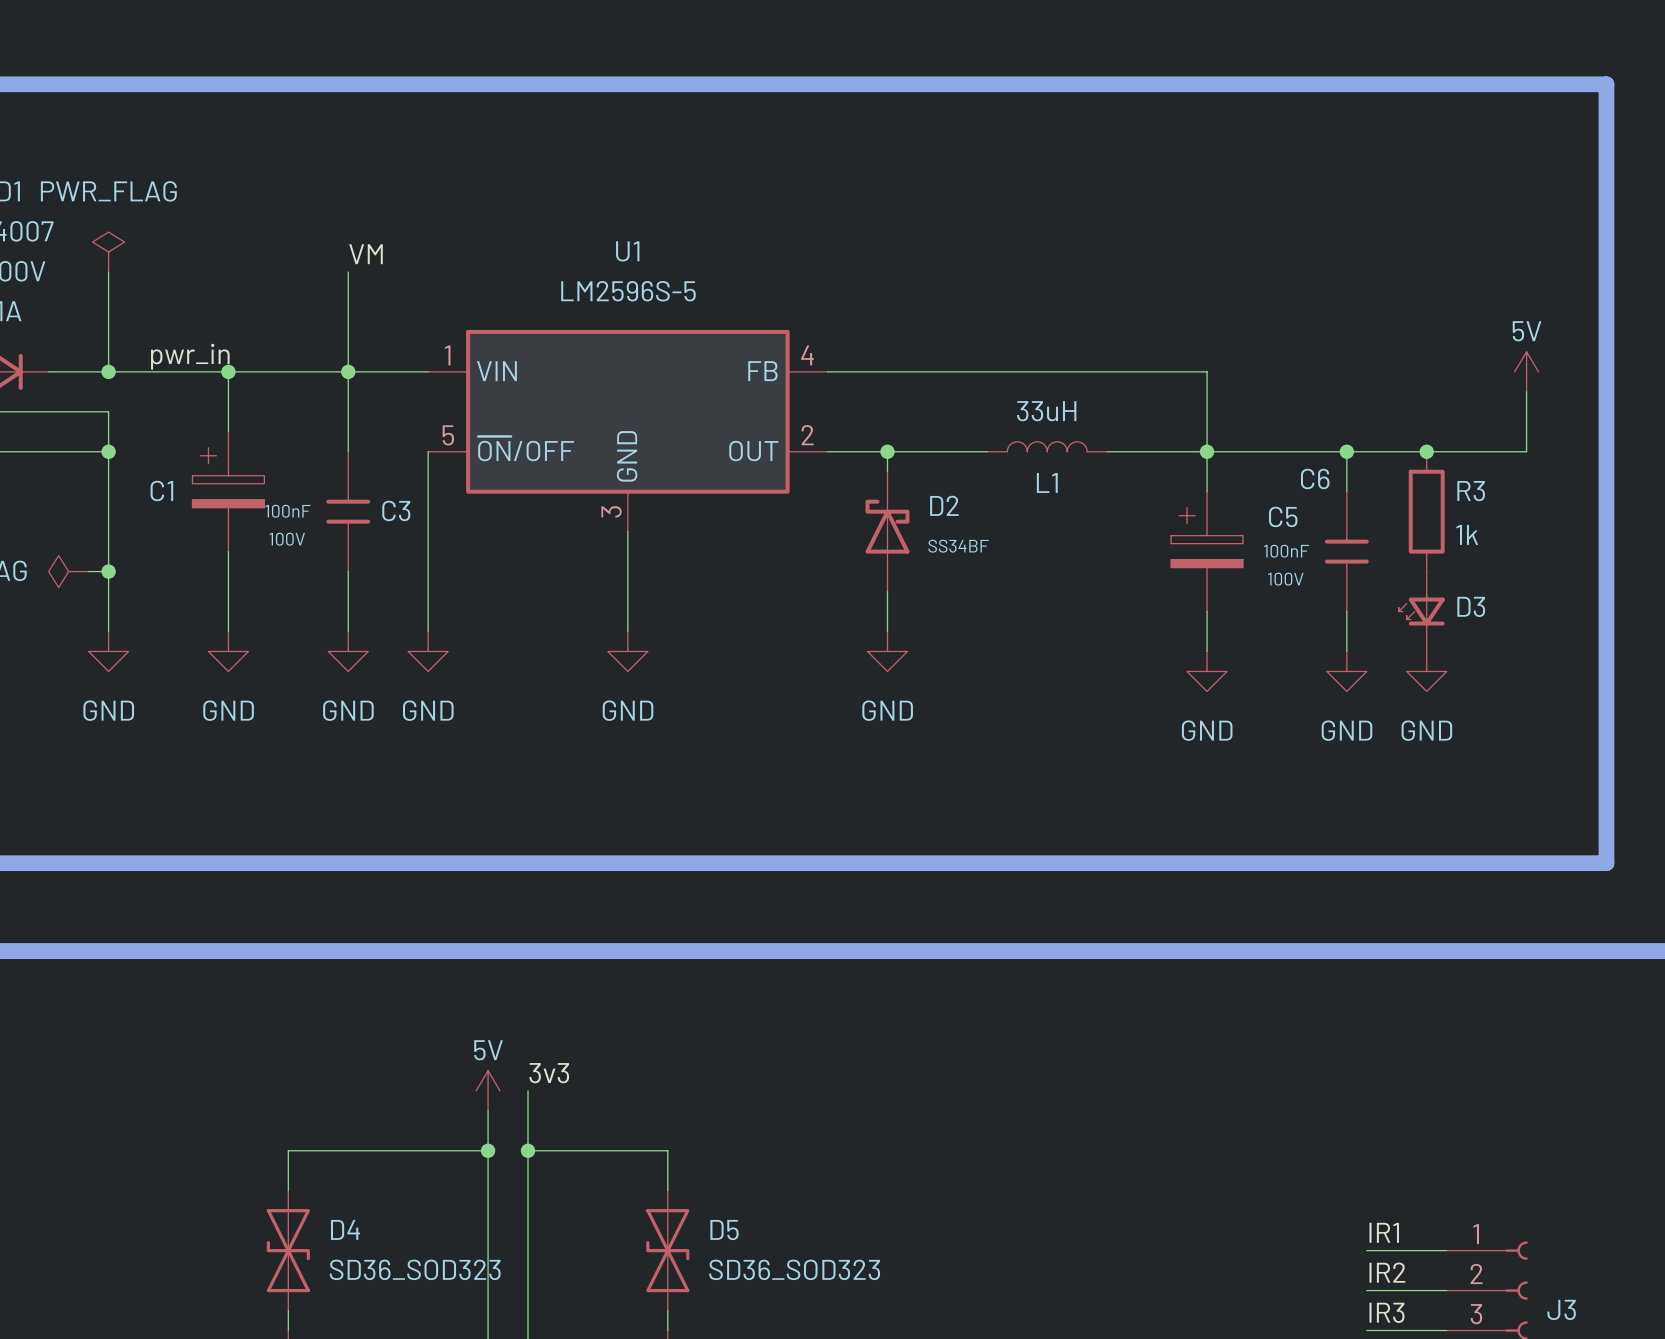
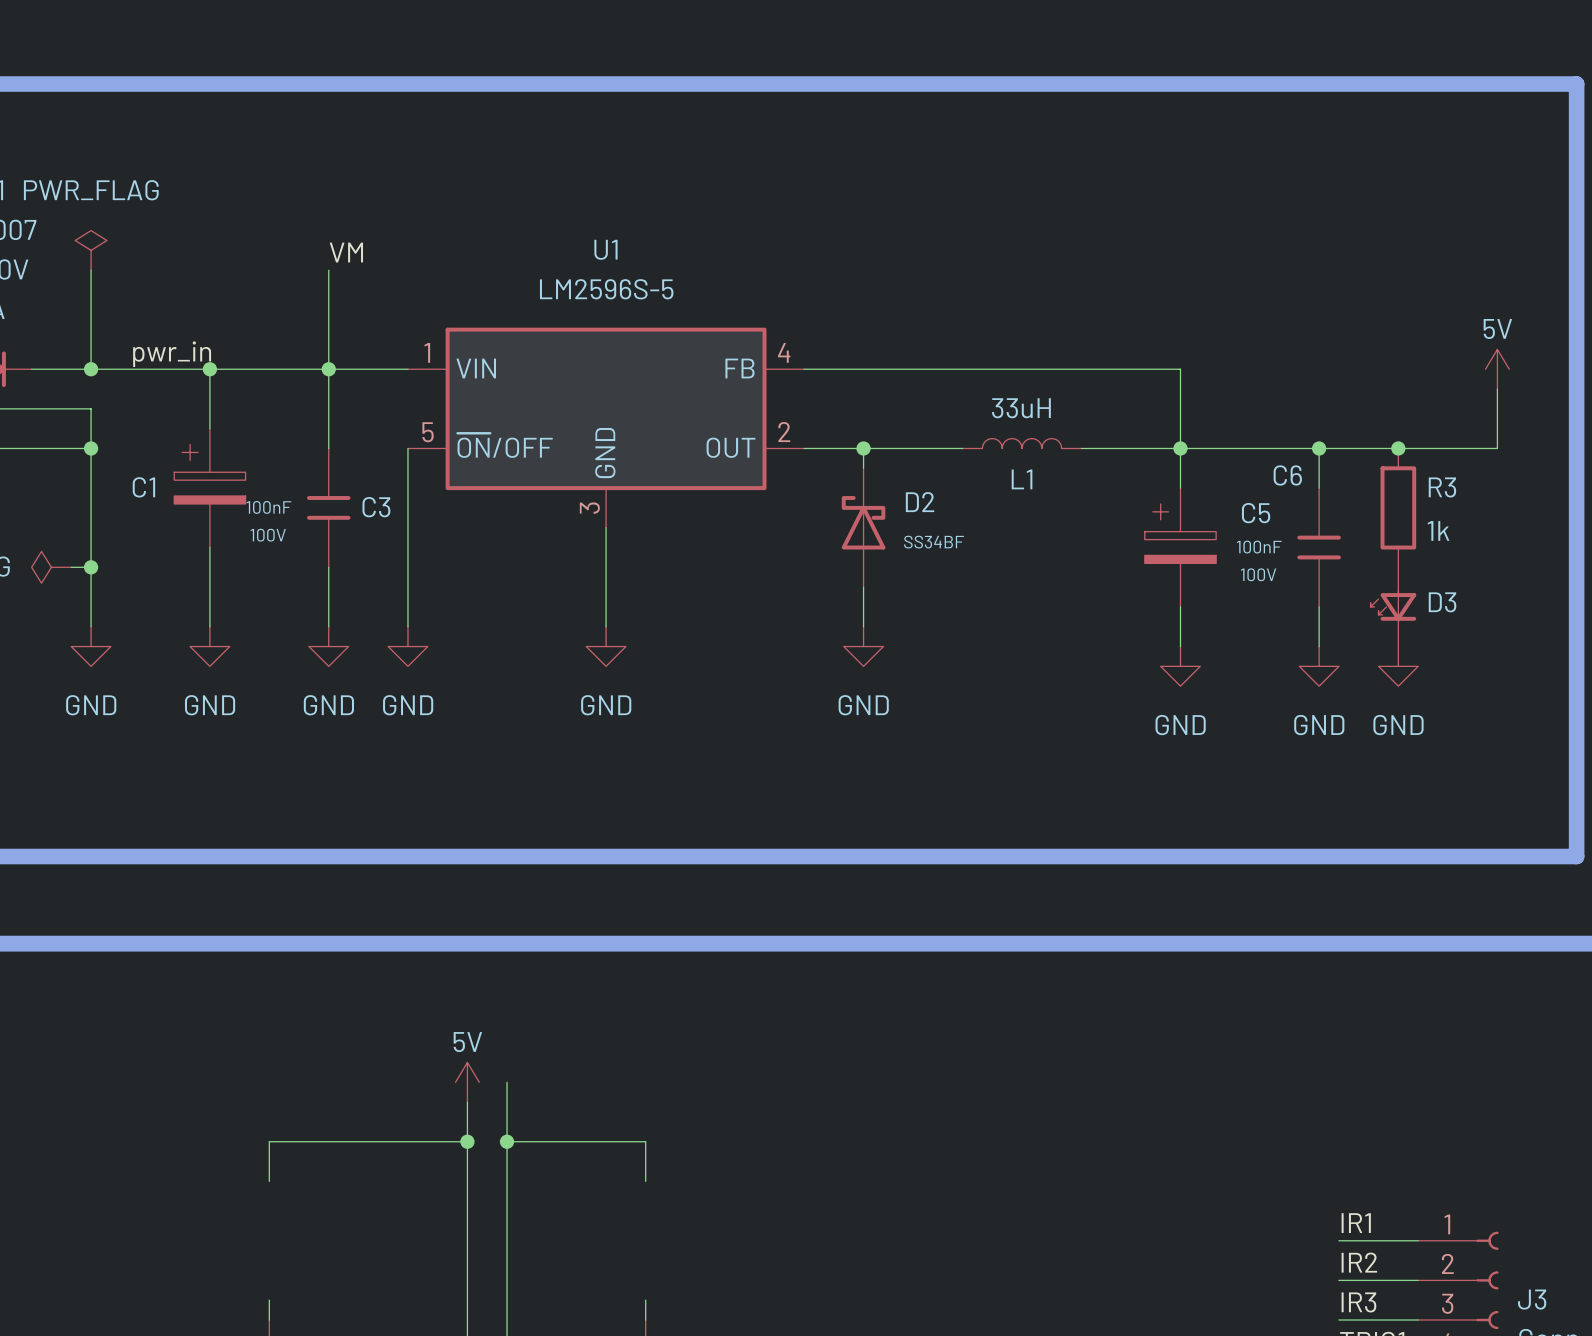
label: 3v3 (549, 1073) -> none
D4: SD36_SOD323 (288, 1250) -> none
D5: SD36_SOD323 (667, 1250) -> none

